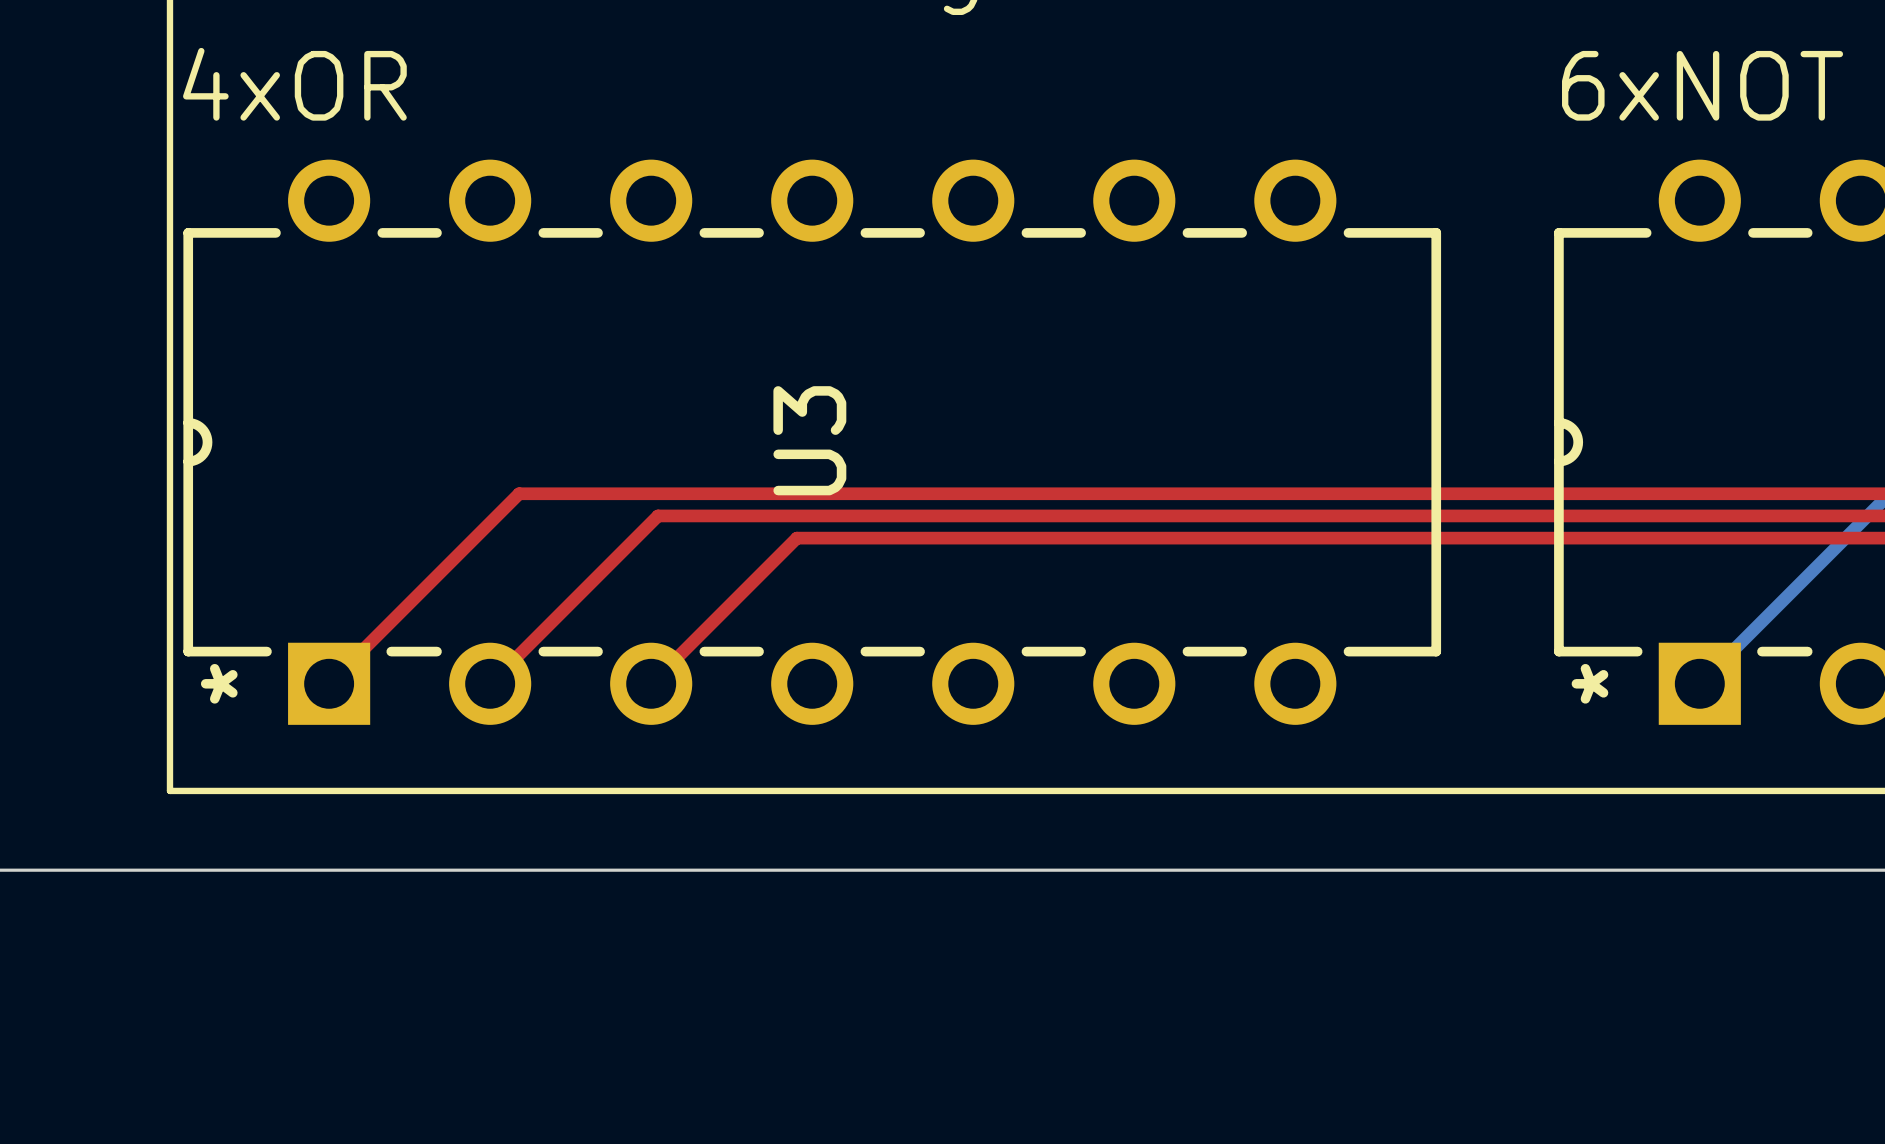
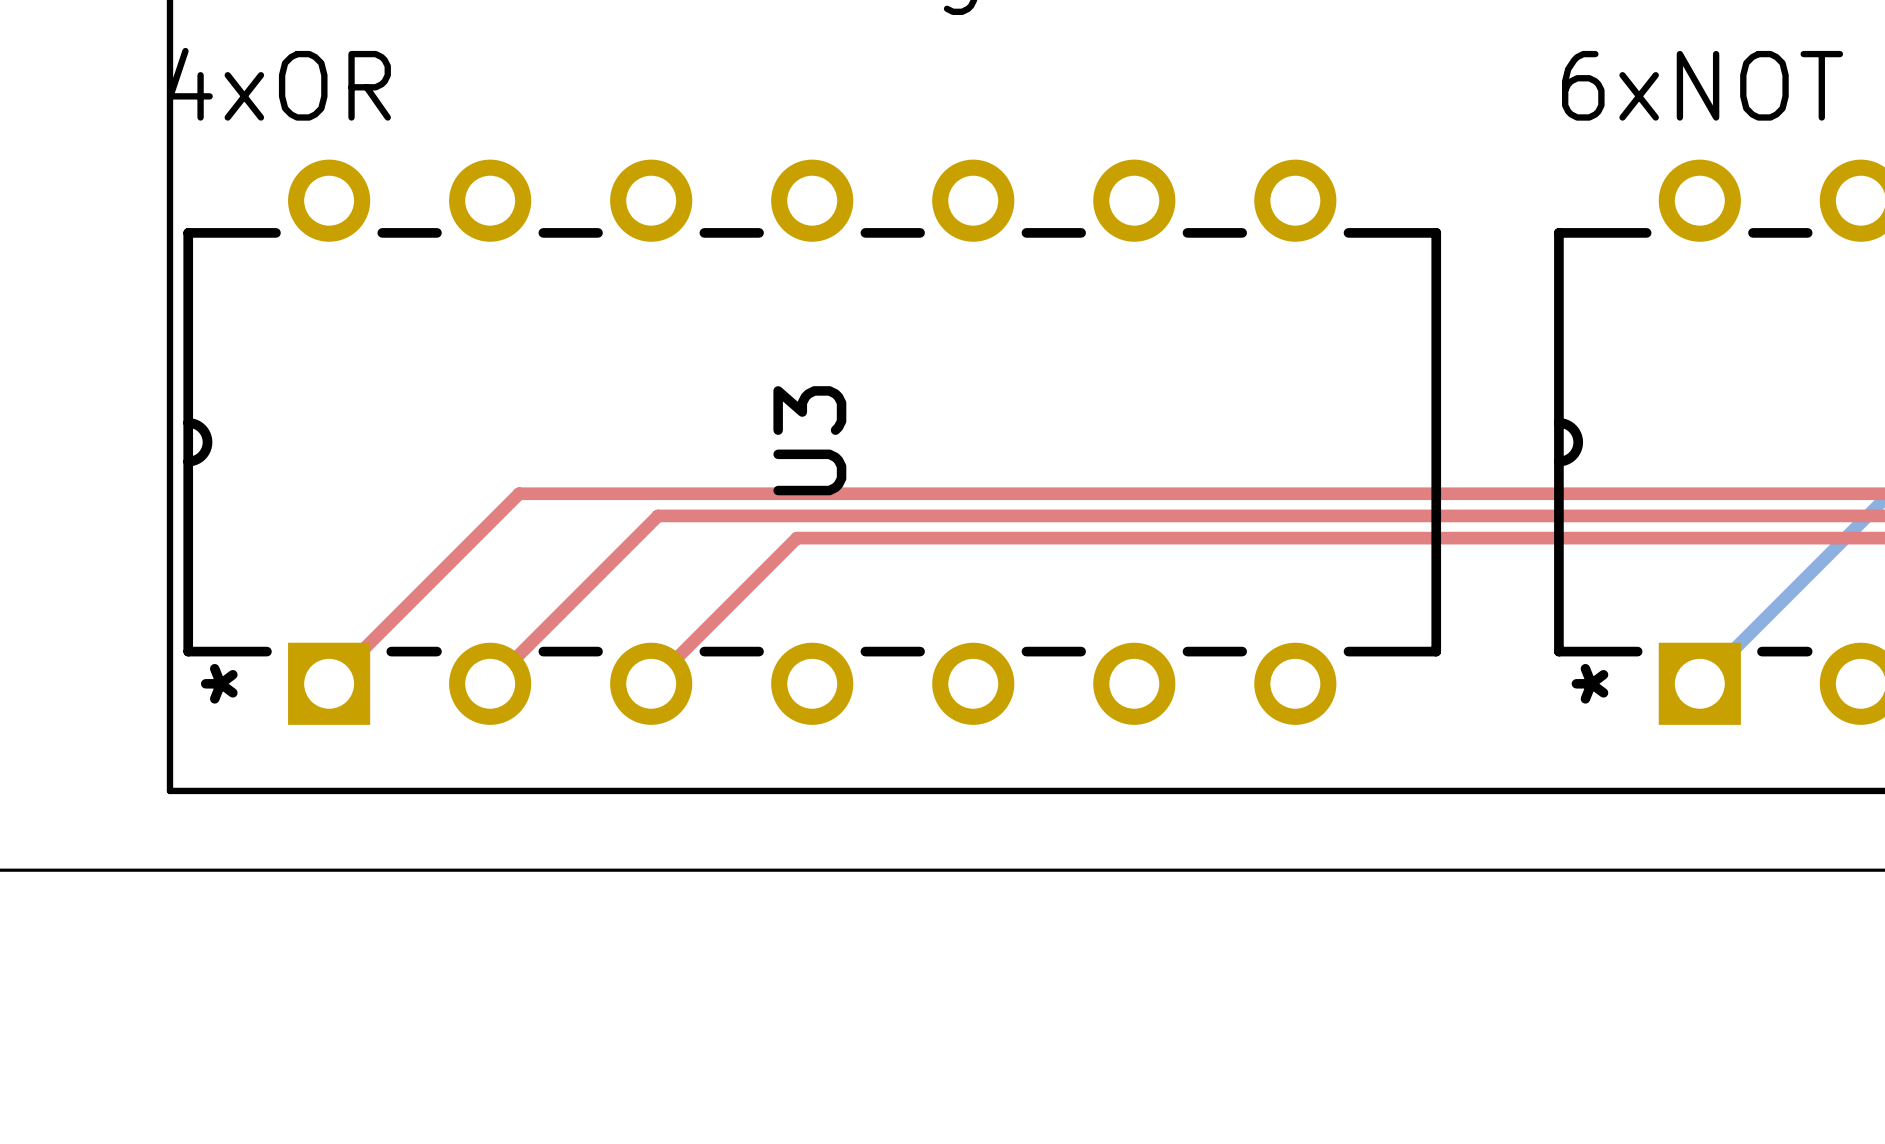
text position: 4xOR (294, 84) -> 4xOR (279, 84)

